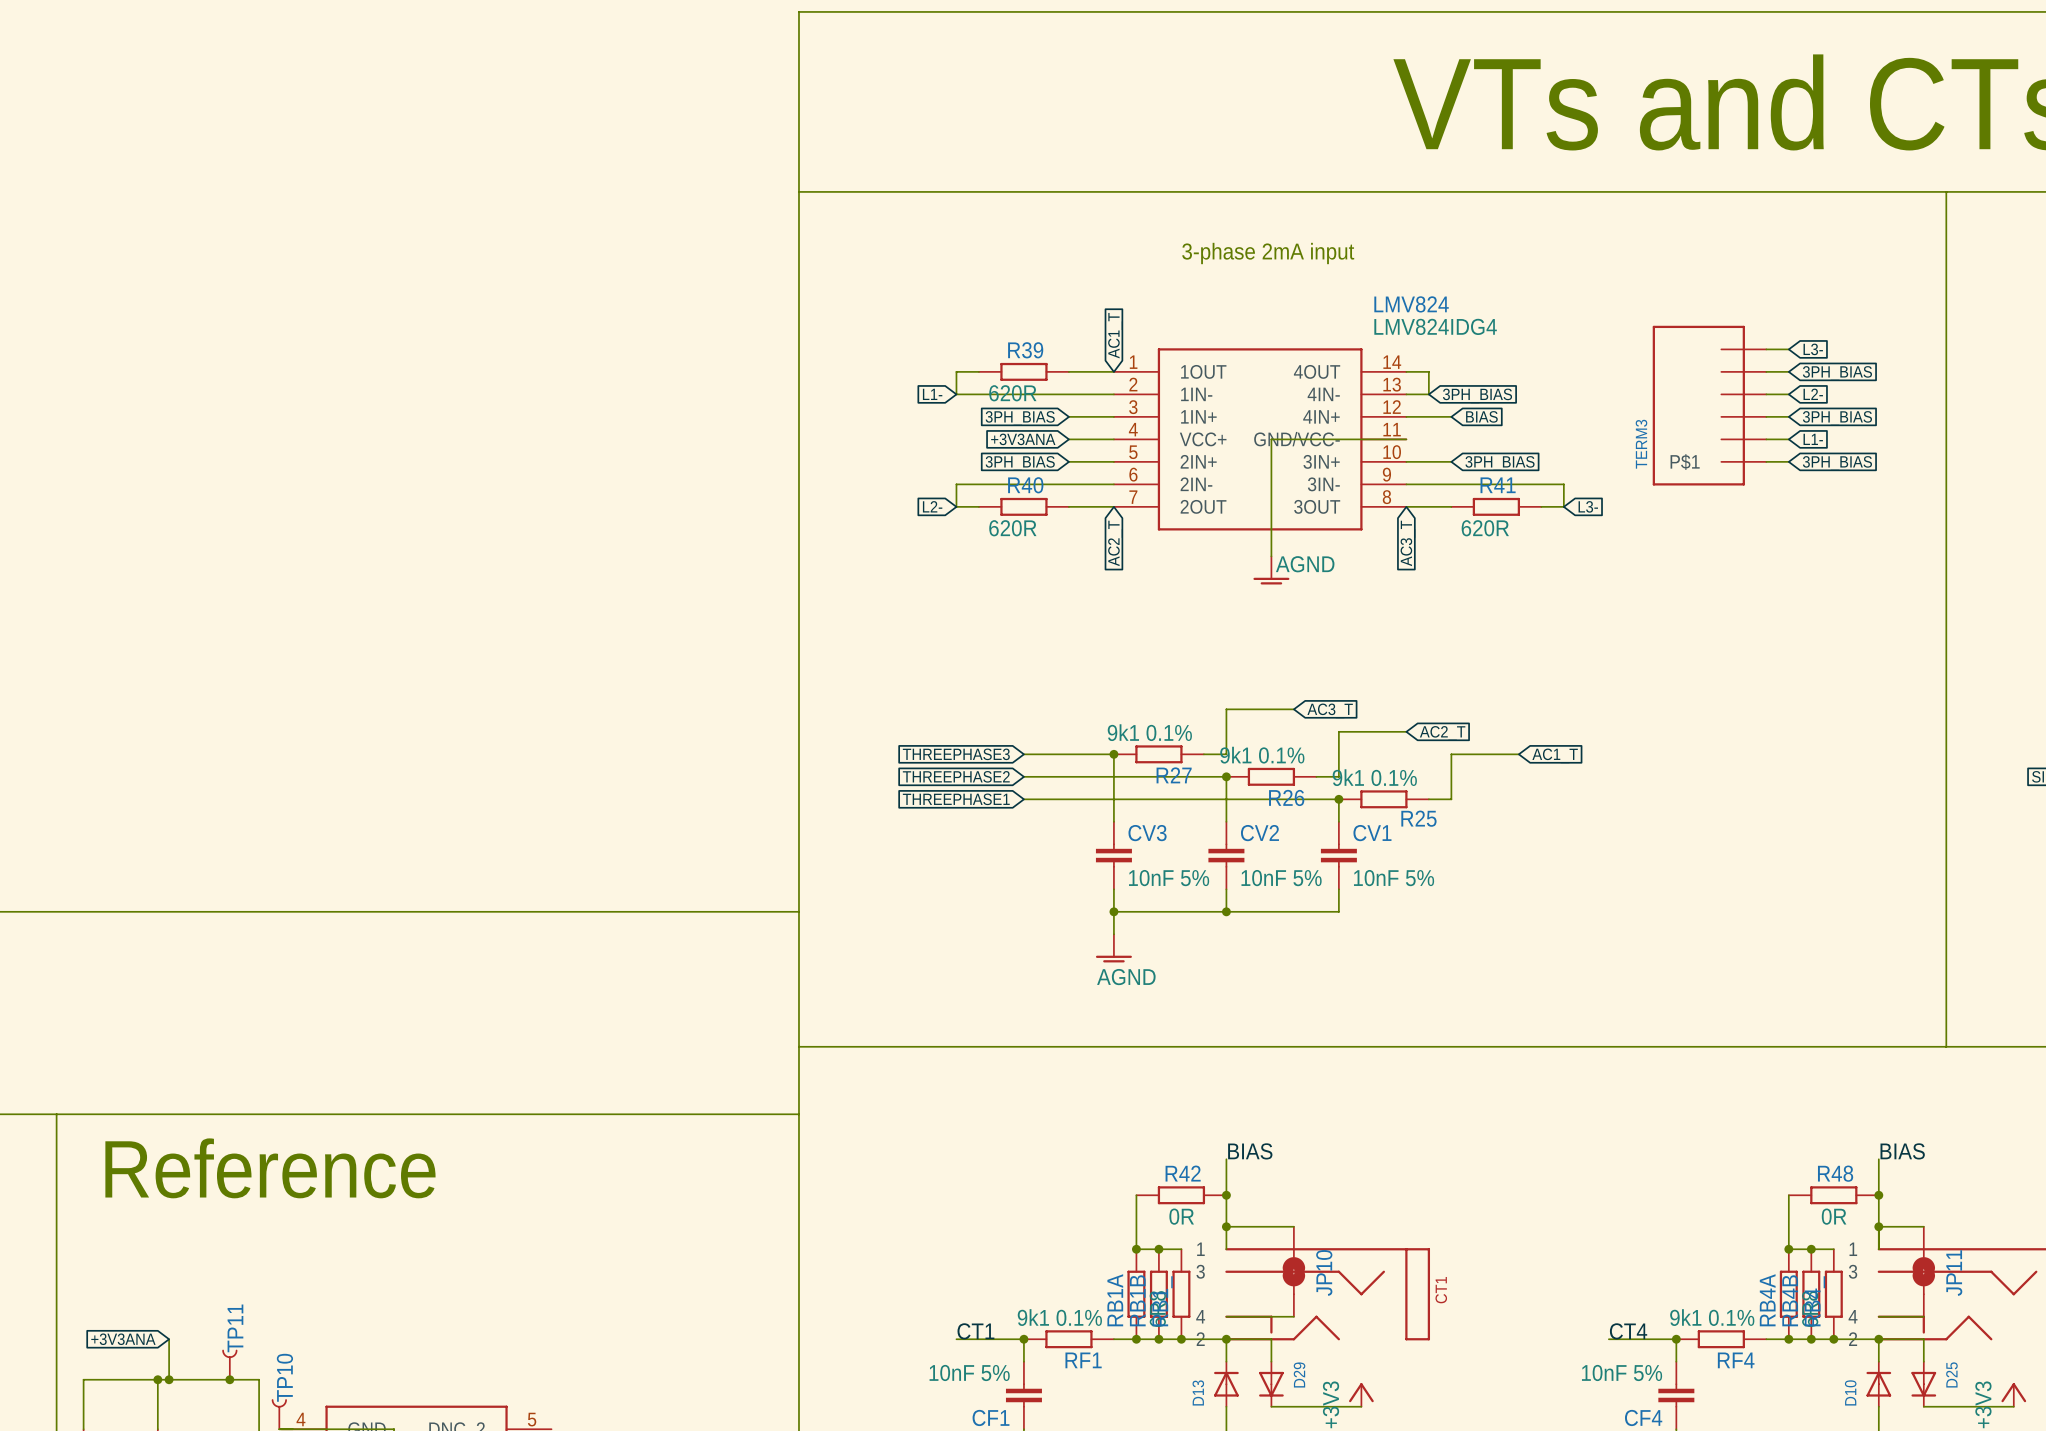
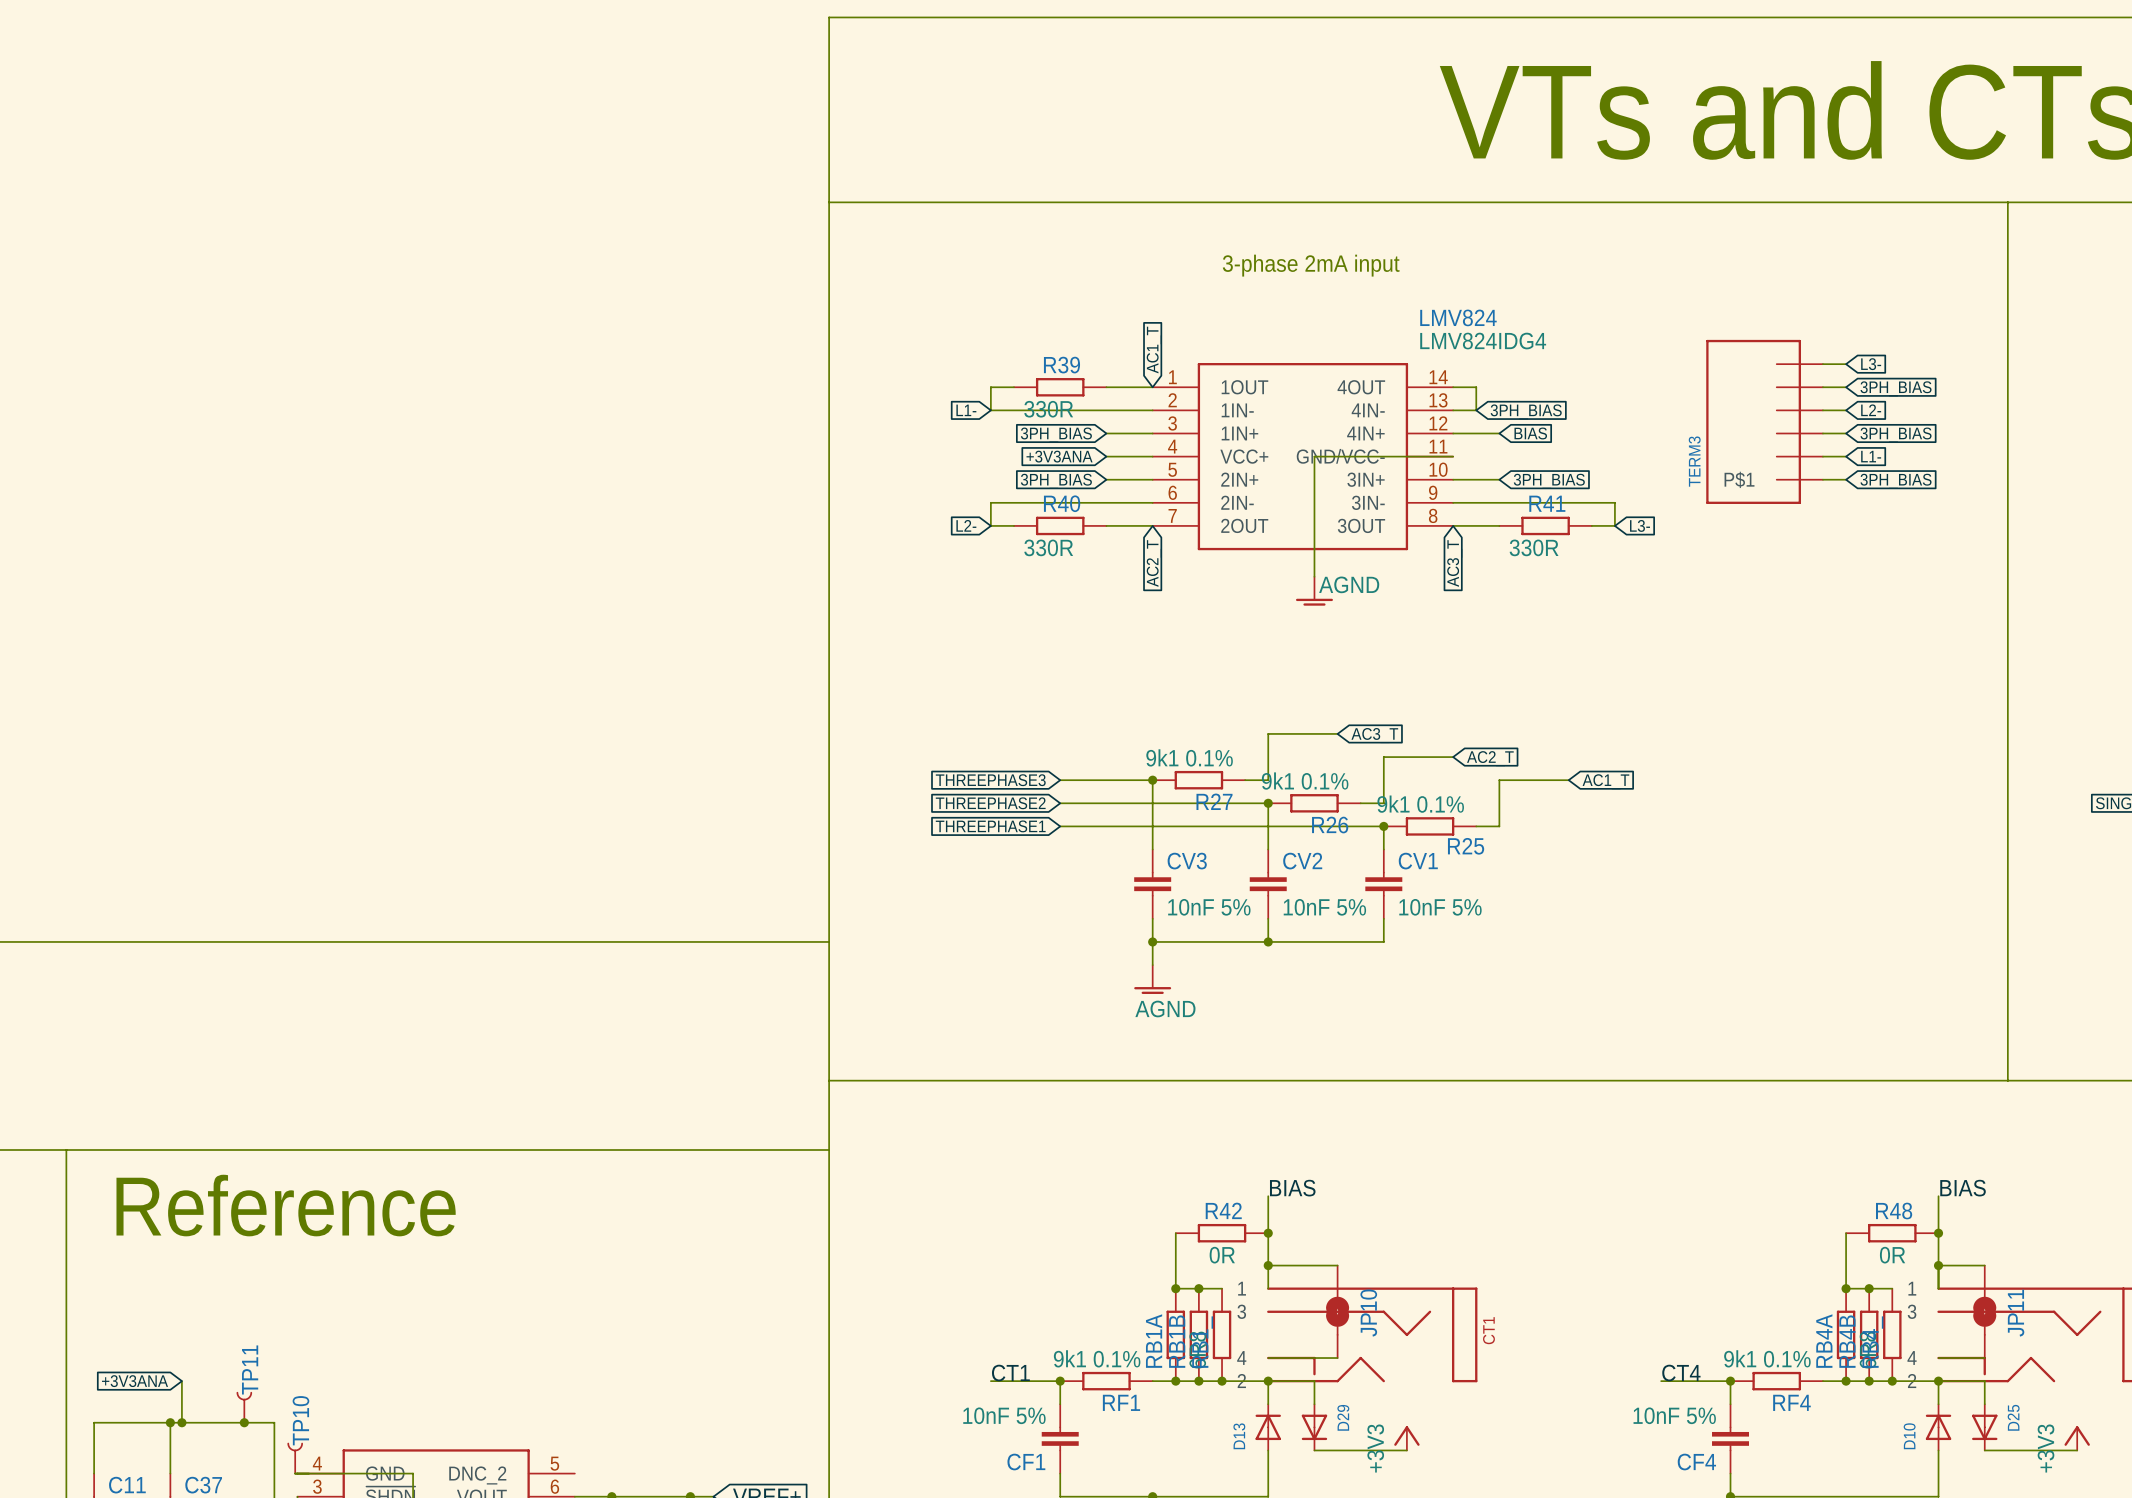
R39 value: 620R (1012, 393) -> 330R (1048, 409)
R40 value: 620R (1012, 528) -> 330R (1048, 547)
R41 value: 620R (1485, 528) -> 330R (1534, 547)

